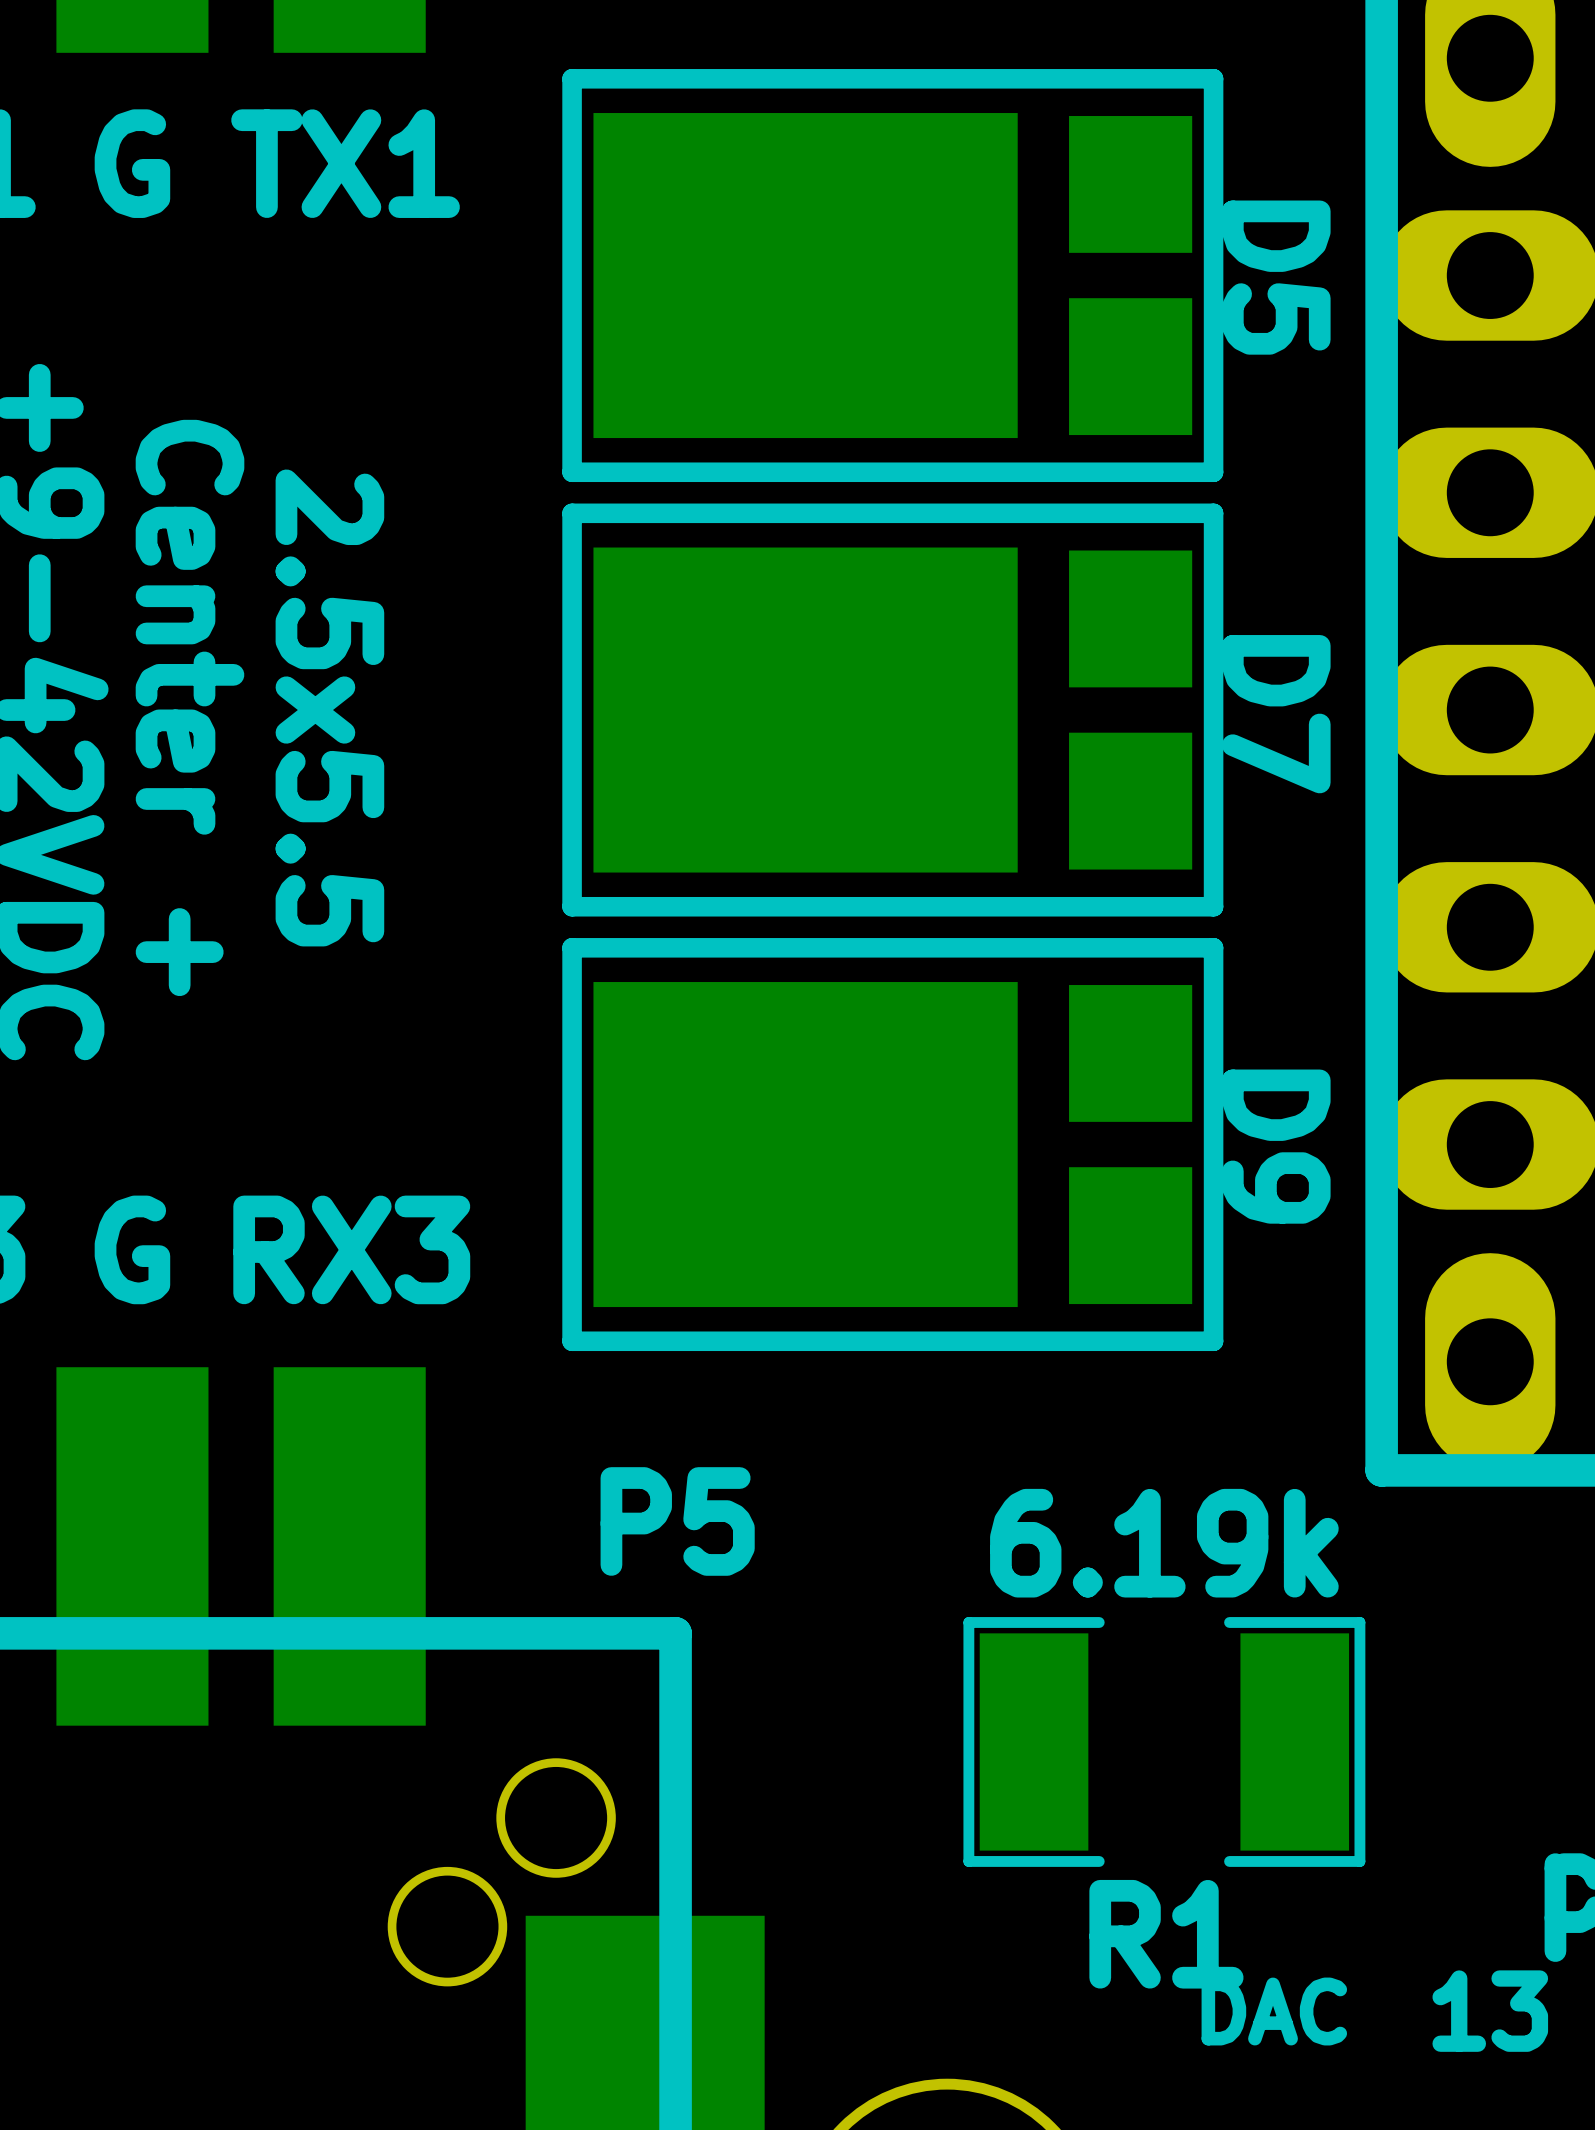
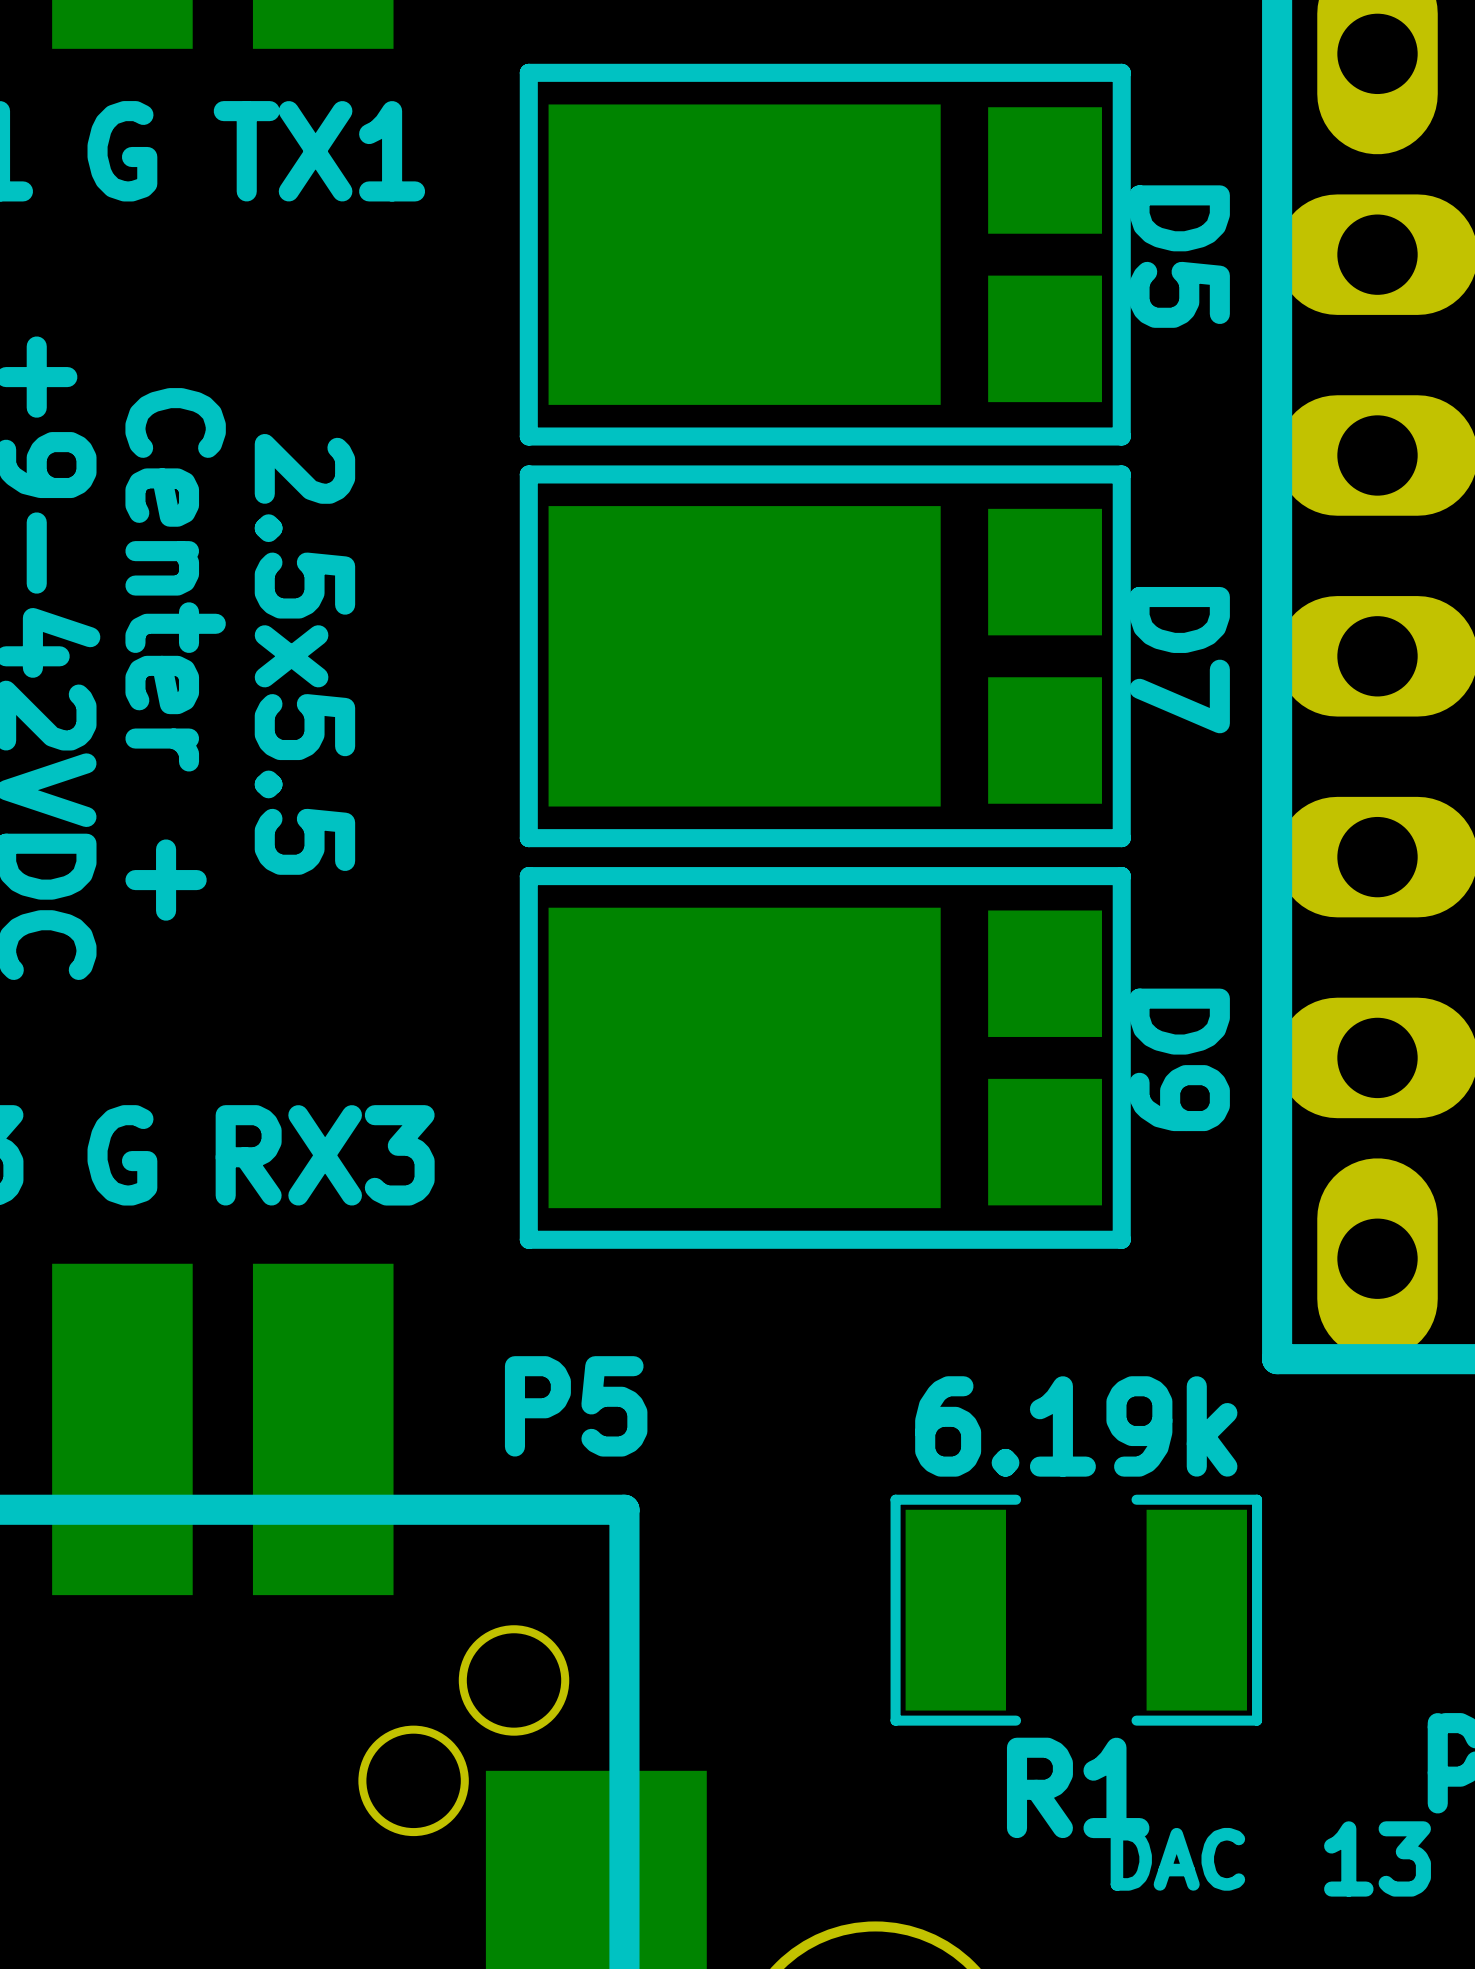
P5 name position: P5 (677, 1521) -> P5 (576, 1406)

